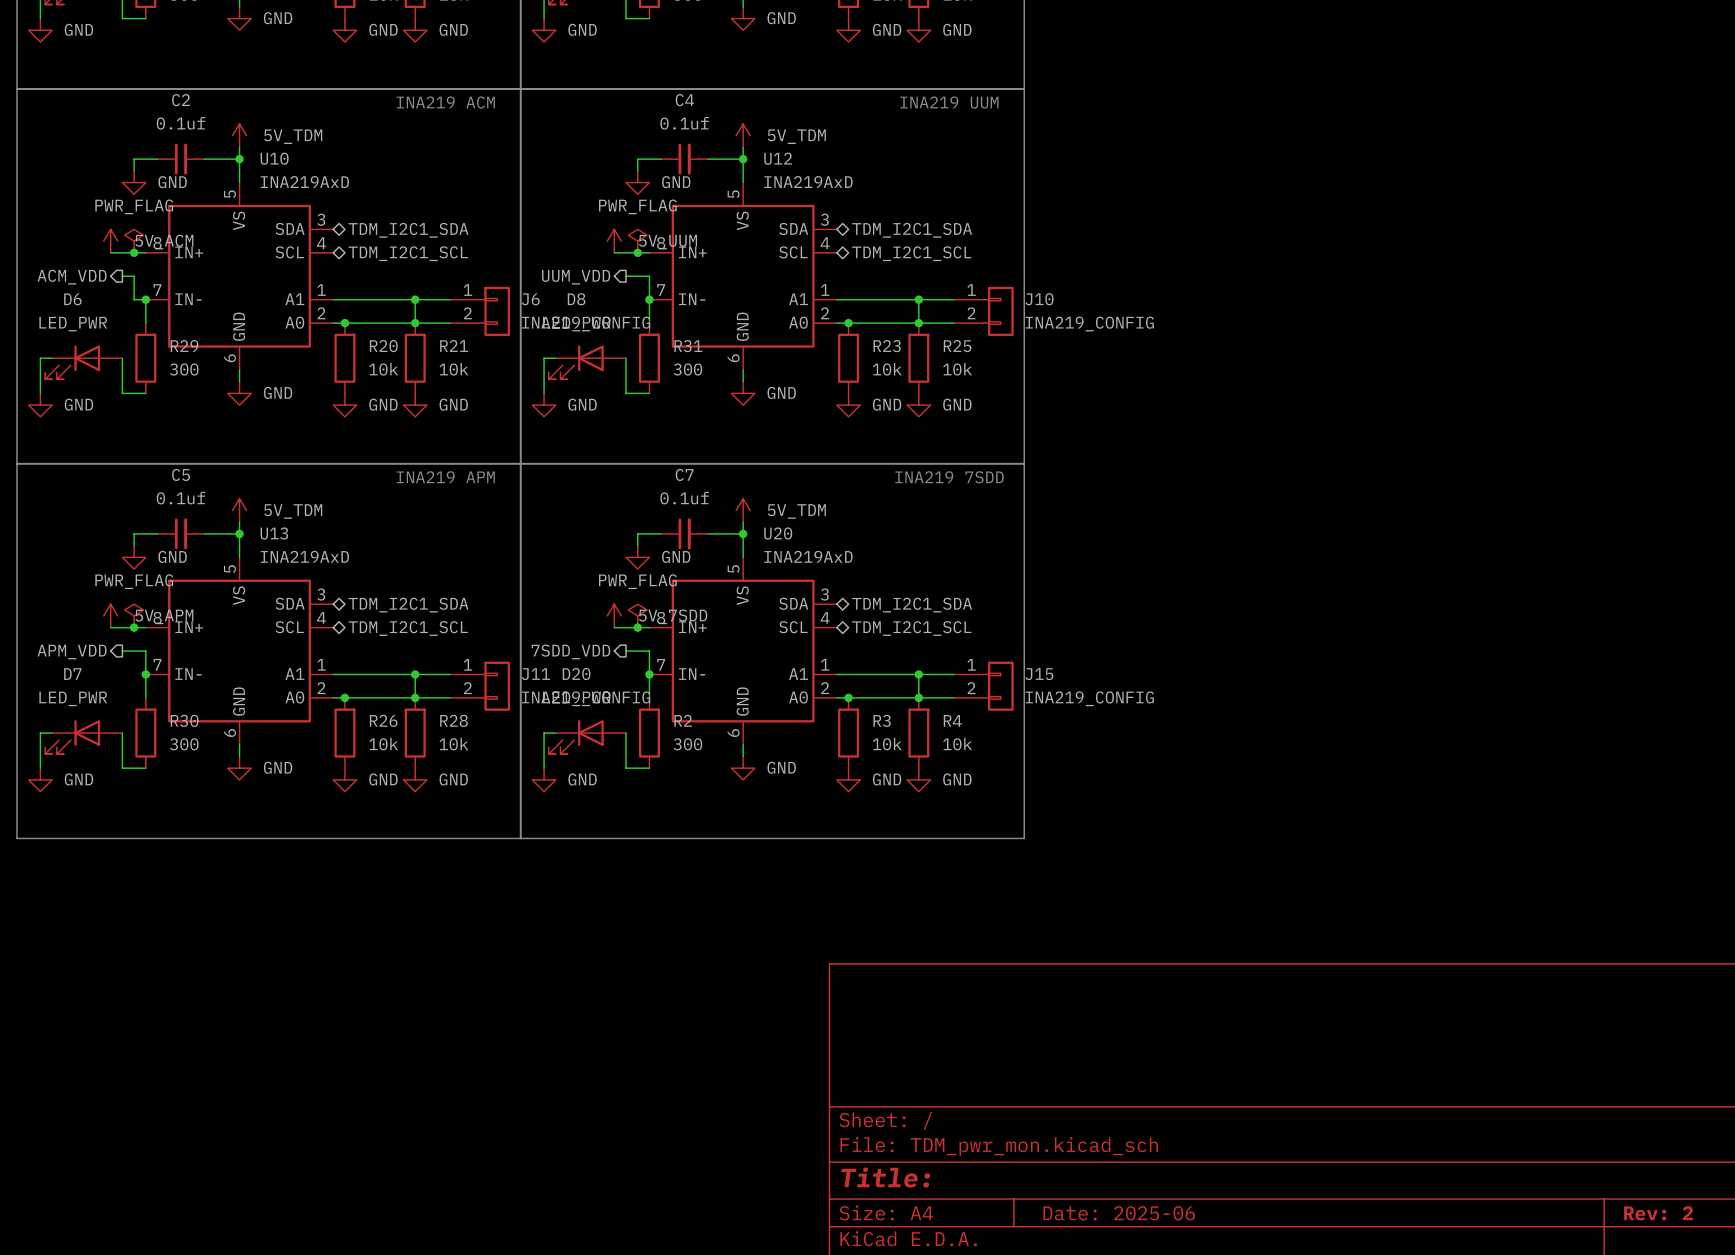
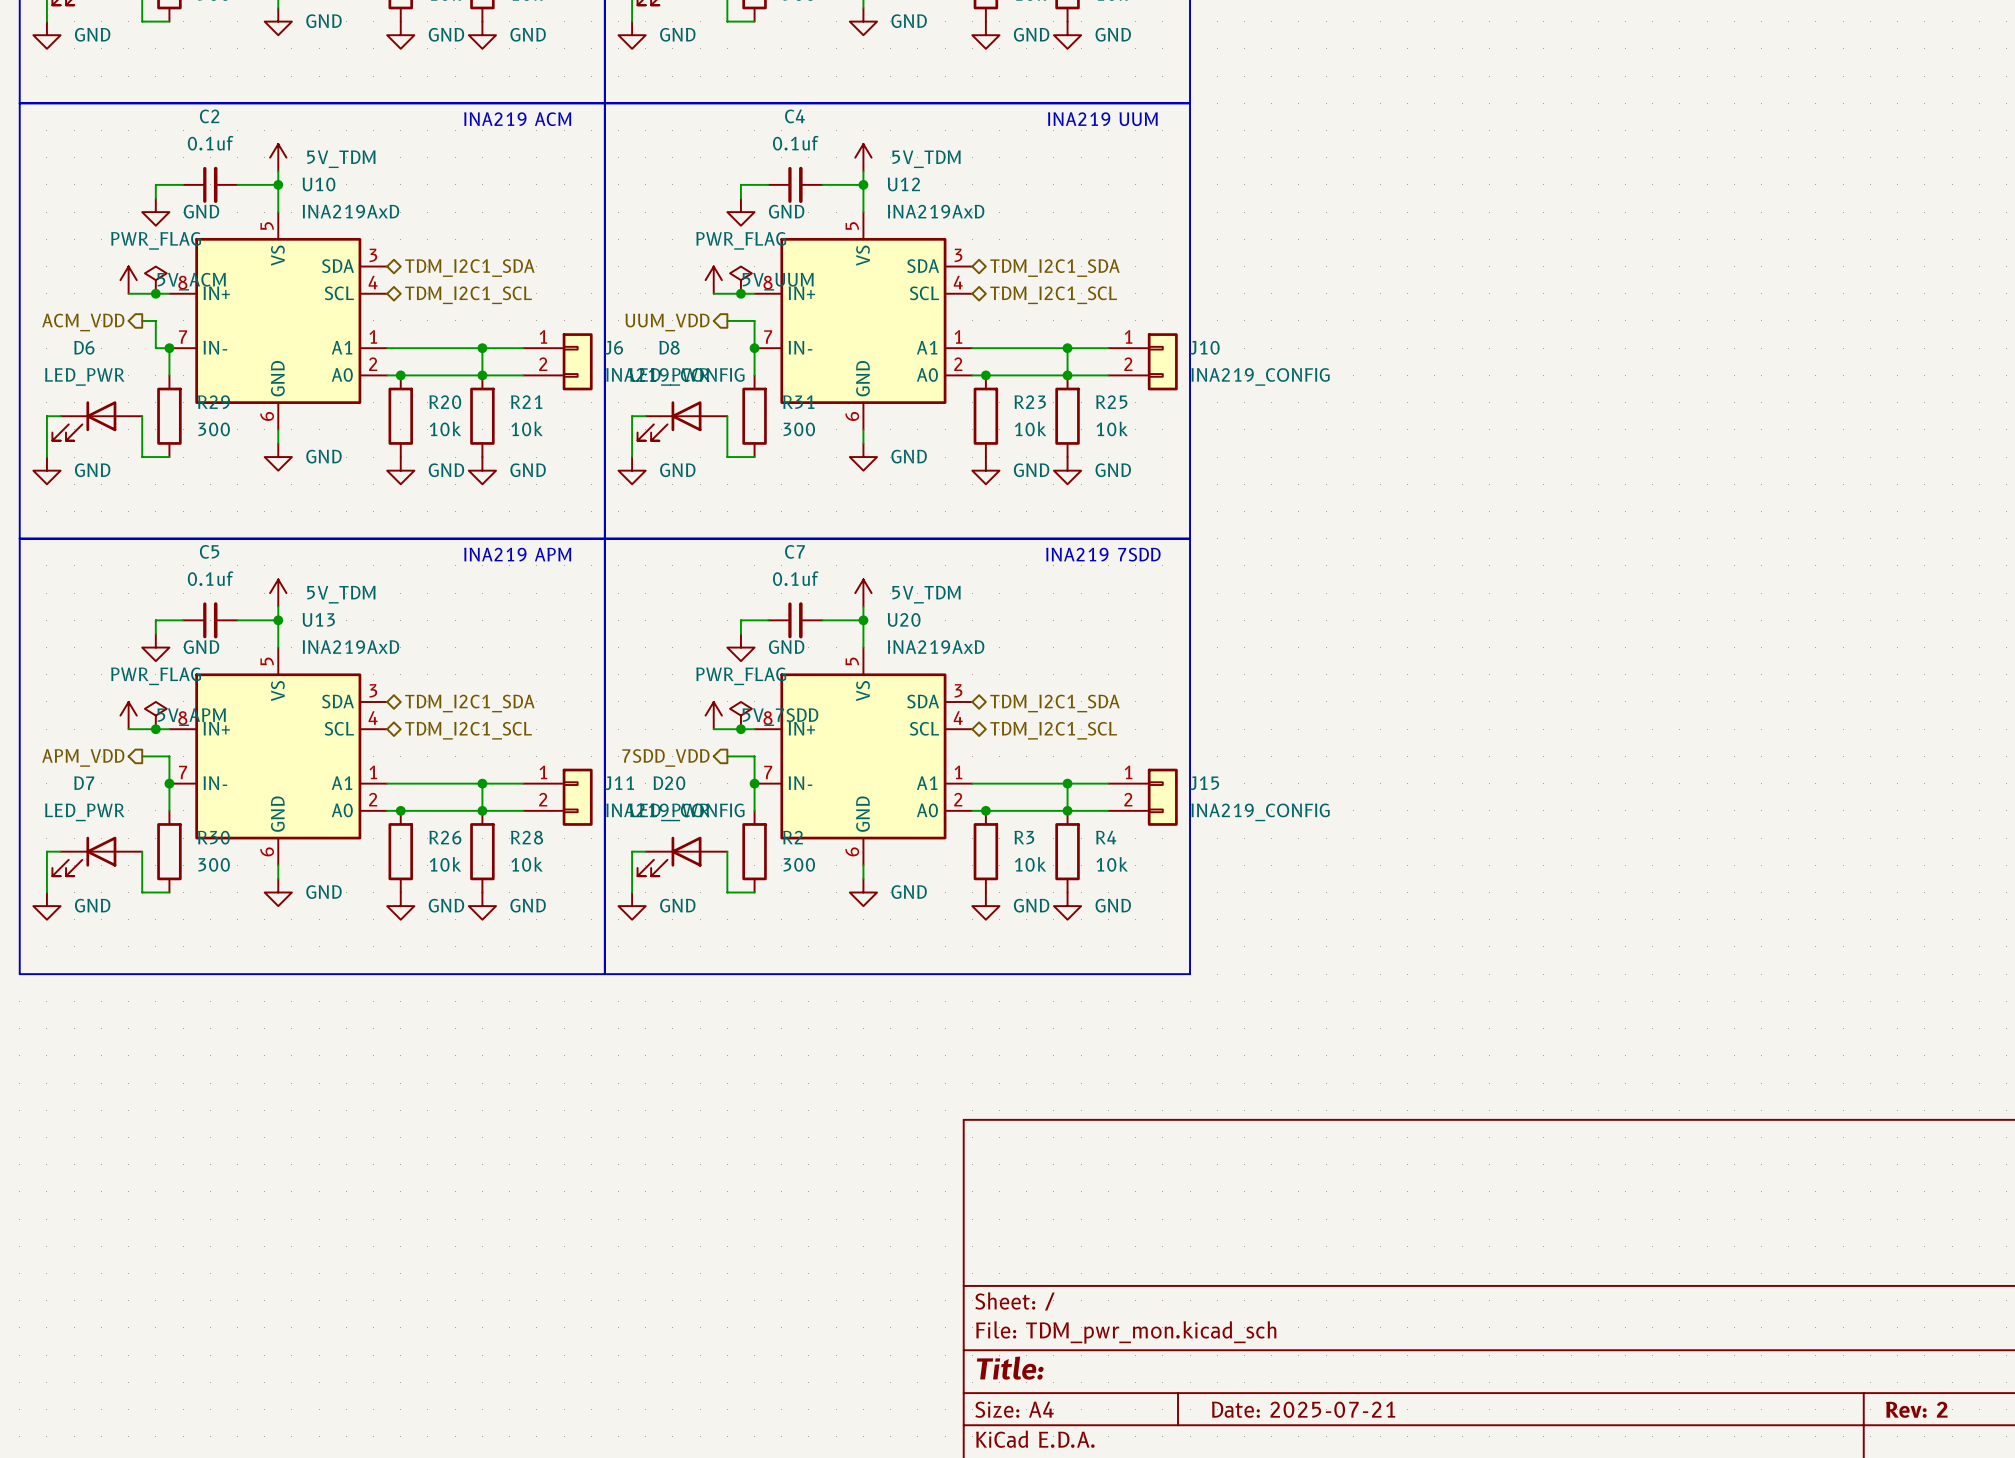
title block: Date: 2025-06 (1119, 1213) -> Date: 2025-07-21 (1303, 1409)

